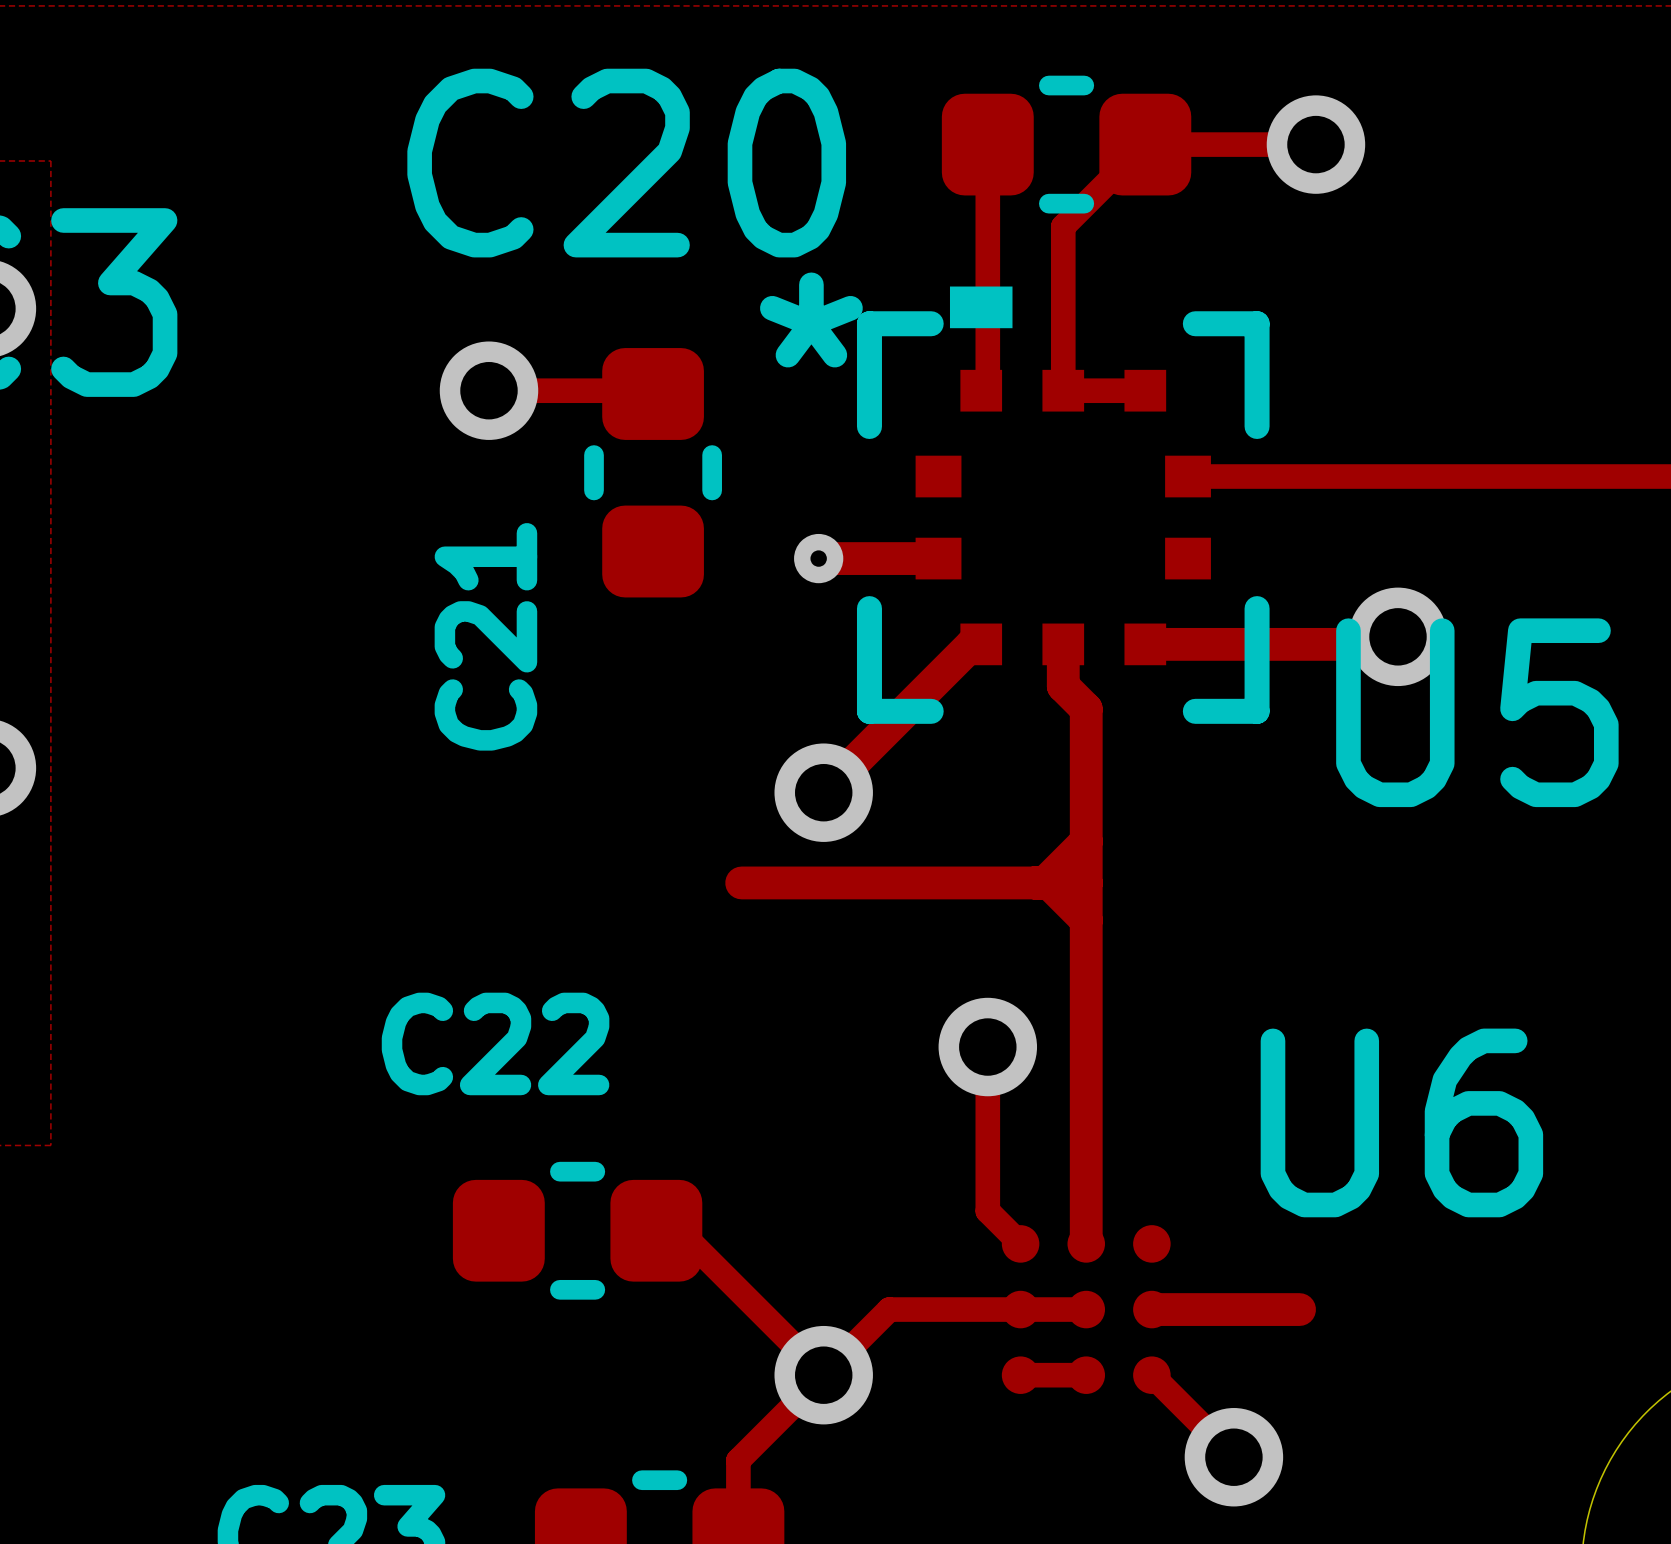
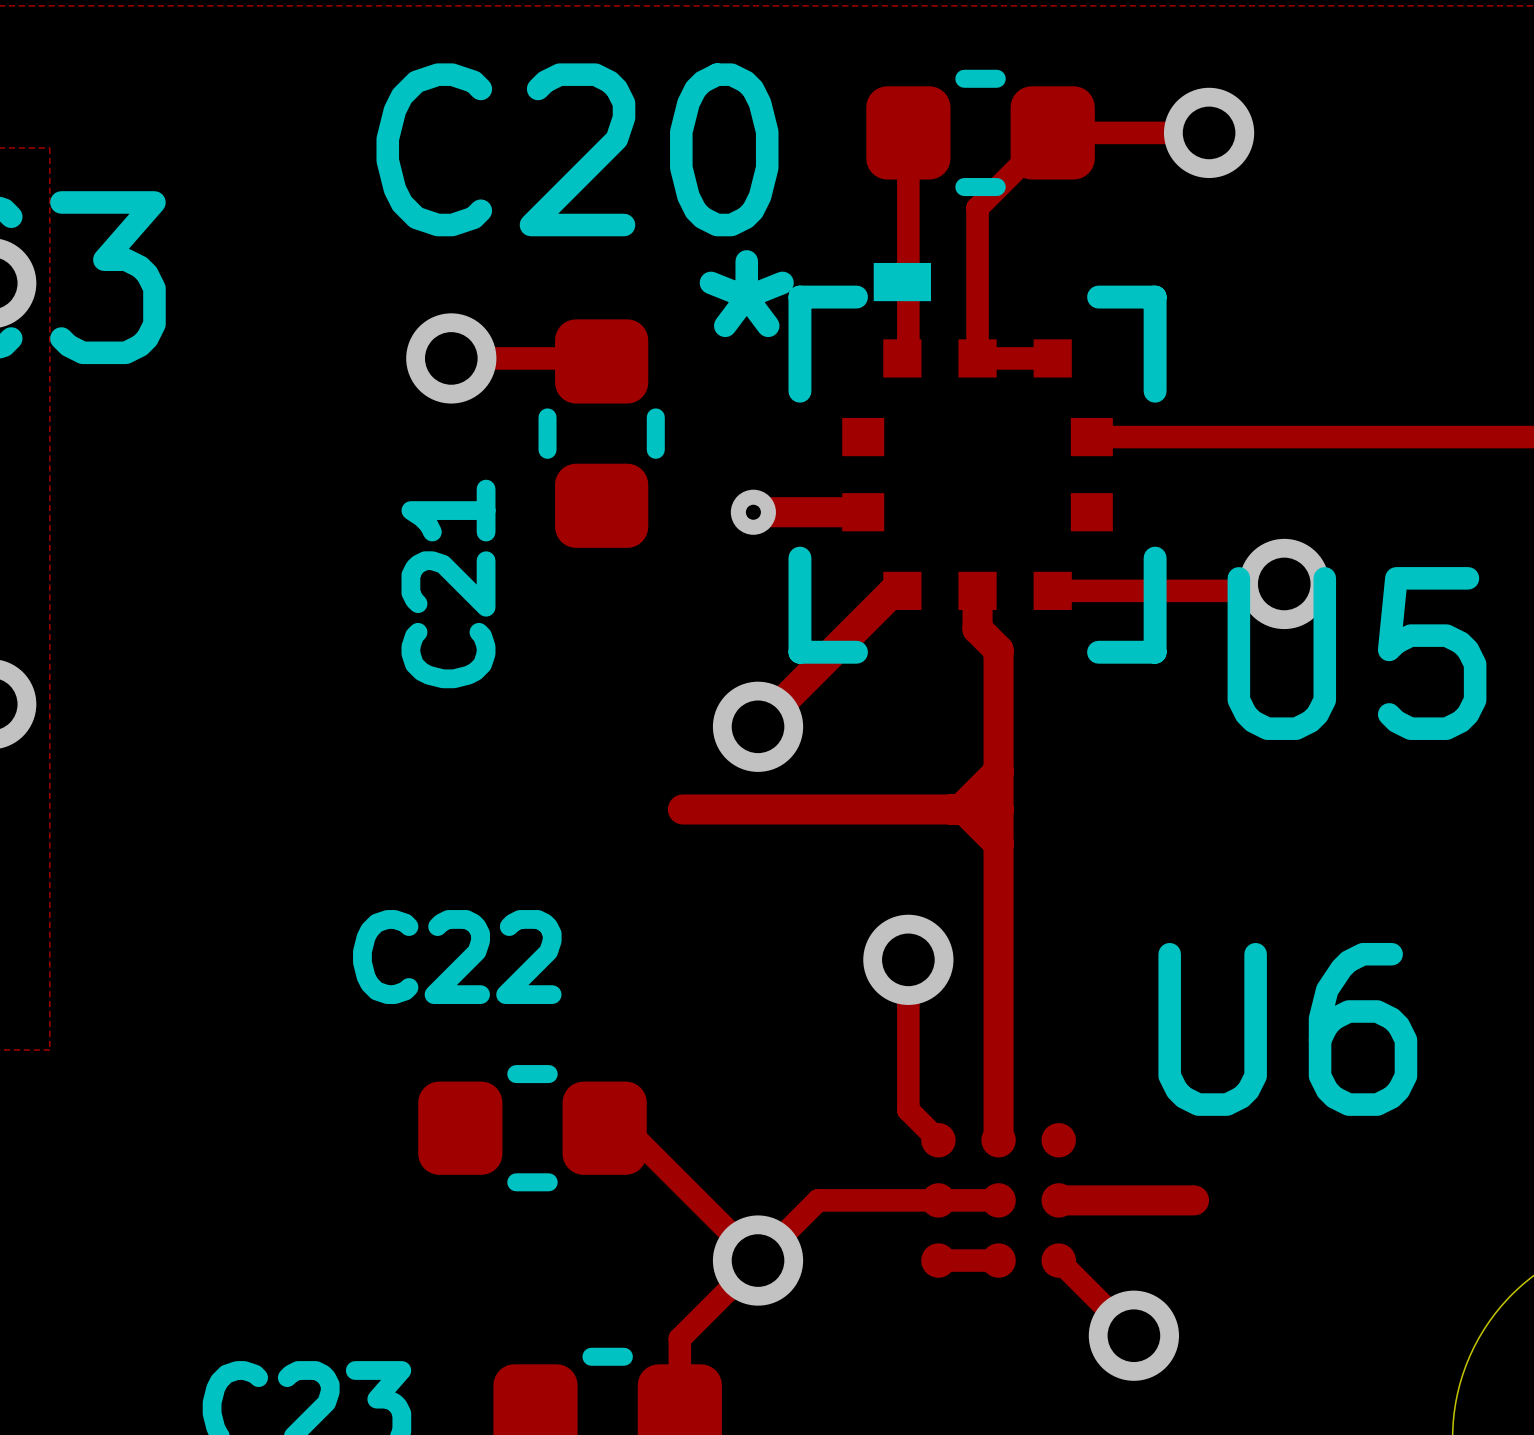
track width: thick (1398, 636) (1390, 644) (1145, 644) -> thin (1284, 583) (1277, 590) (1052, 590)

